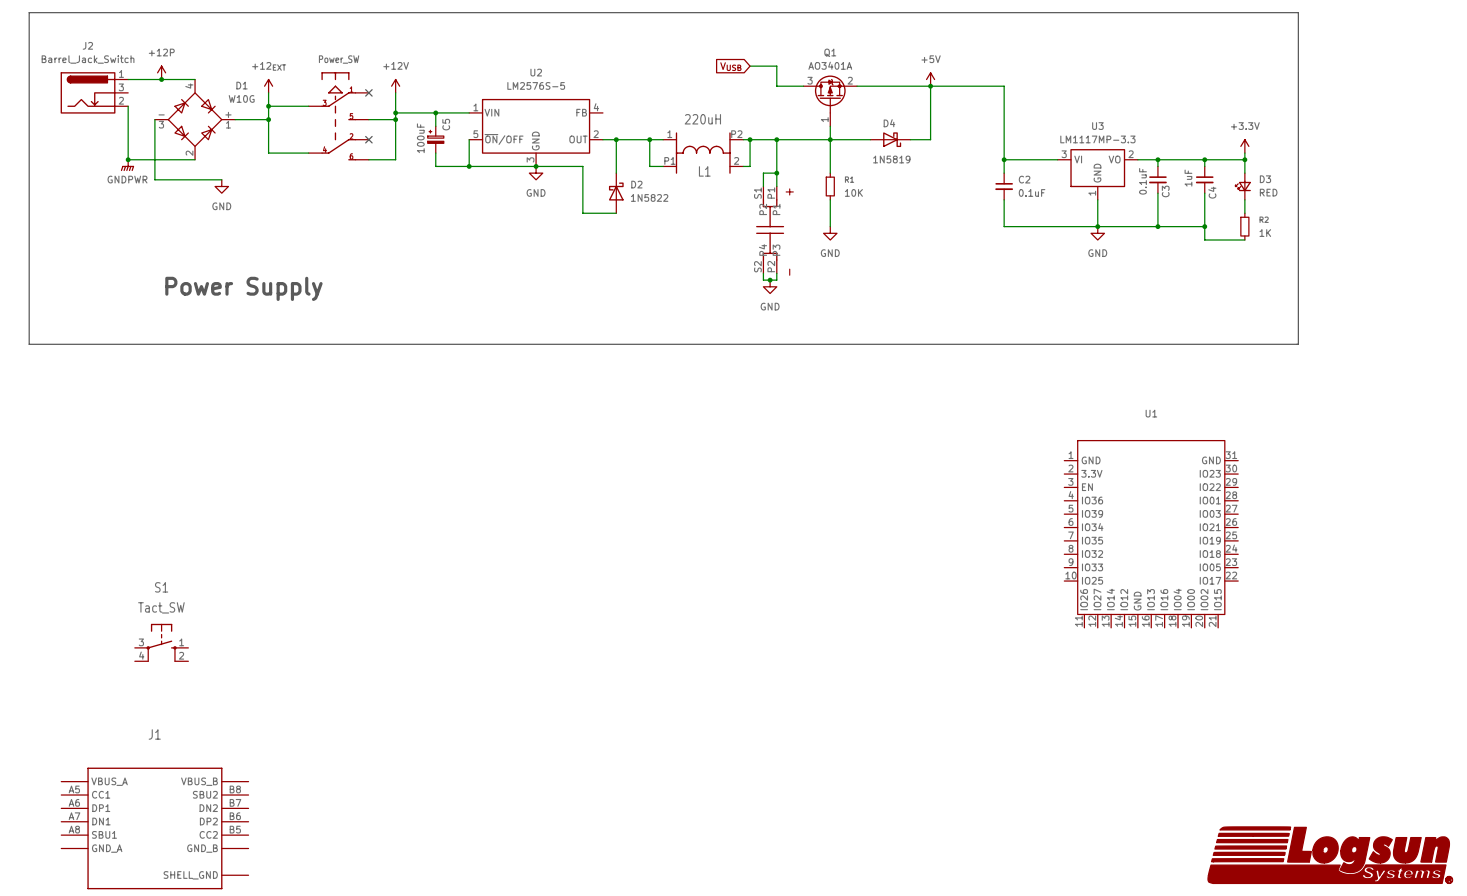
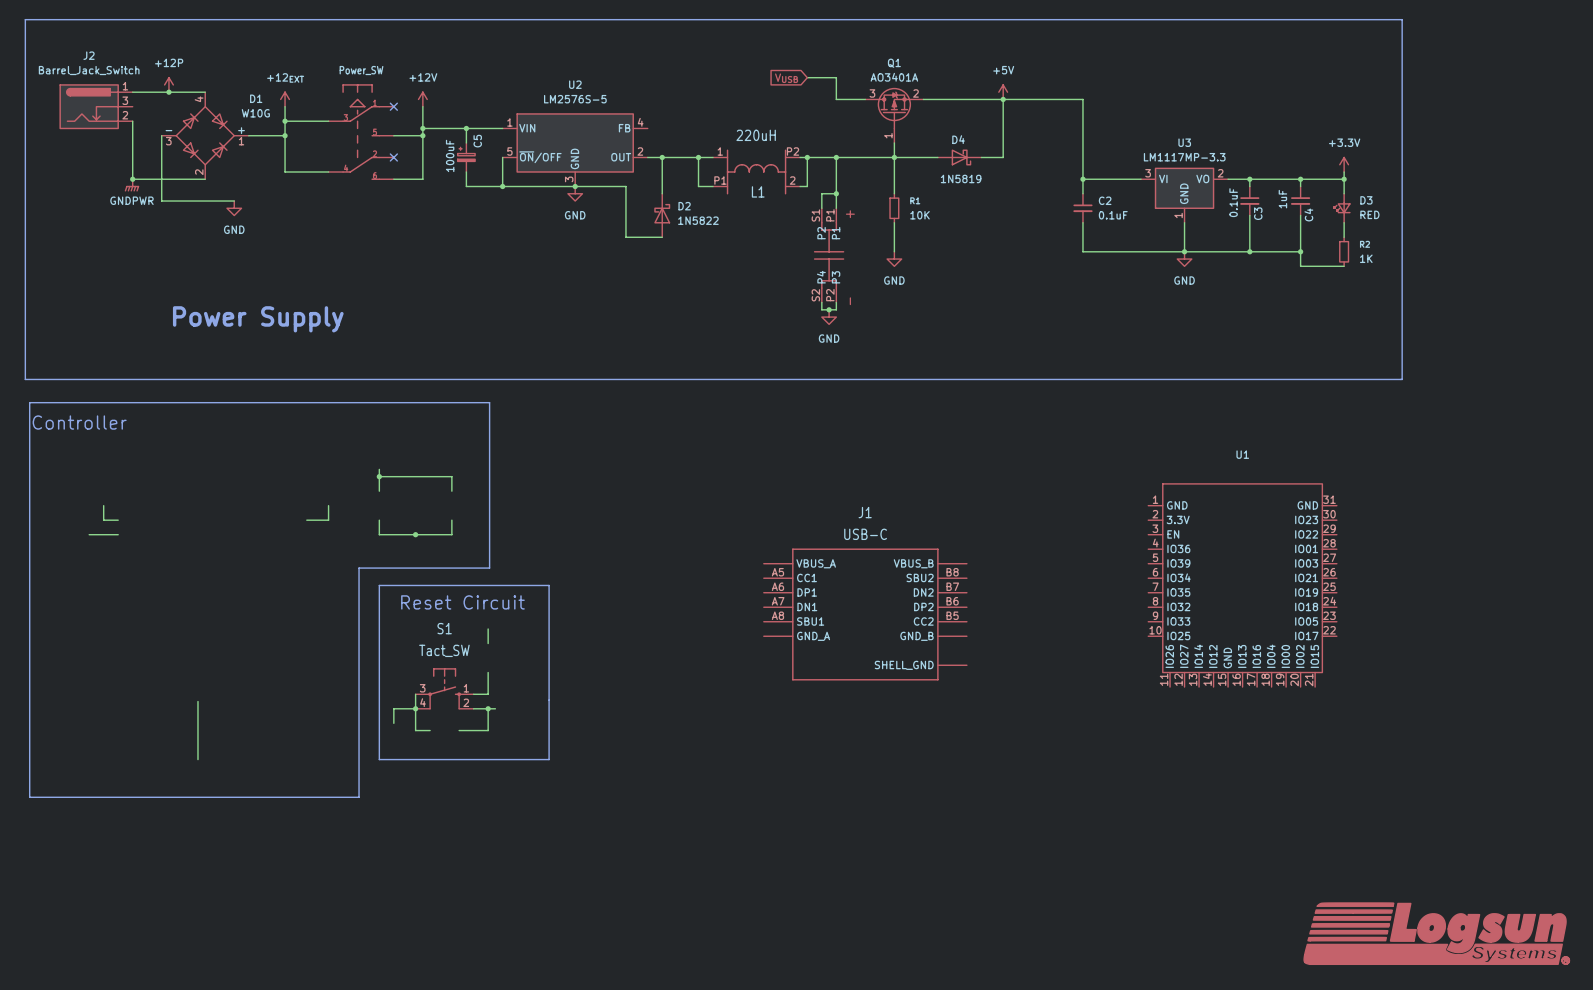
line: none -> (29, 402) (489, 402) (489, 568) (359, 568) (359, 797) (29, 797) (29, 402)
text: none -> Controller (79, 422)
wire: none -> (379, 469) (379, 491)
wire: none -> (379, 476) (451, 476) (451, 491)
junction: none -> (379, 476)
wire: none -> (103, 505) (103, 520) (118, 520)
wire: none -> (328, 505) (328, 520) (306, 520)
wire: none -> (379, 520) (379, 534) (451, 534) (451, 520)
wire: none -> (89, 534) (118, 534)
junction: none -> (415, 534)
J1 value: none -> USB-C (865, 534)
line: none -> (379, 585) (549, 585) (549, 759) (379, 759) (379, 585)
text: none -> Reset Circuit (462, 602)
wire: none -> (488, 629) (488, 643)
wire: none -> (488, 672) (488, 694) (473, 694)
wire: none -> (415, 694) (415, 730) (430, 730)
wire: none -> (197, 701) (197, 759)
S1 position: (161, 642) -> (444, 688)
wire: none -> (415, 708) (393, 708) (393, 723)
junction: none -> (415, 708)
wire: none -> (473, 708) (495, 708)
wire: none -> (488, 708) (488, 730) (459, 730)
junction: none -> (488, 708)
J1 position: (154, 828) -> (865, 614)

